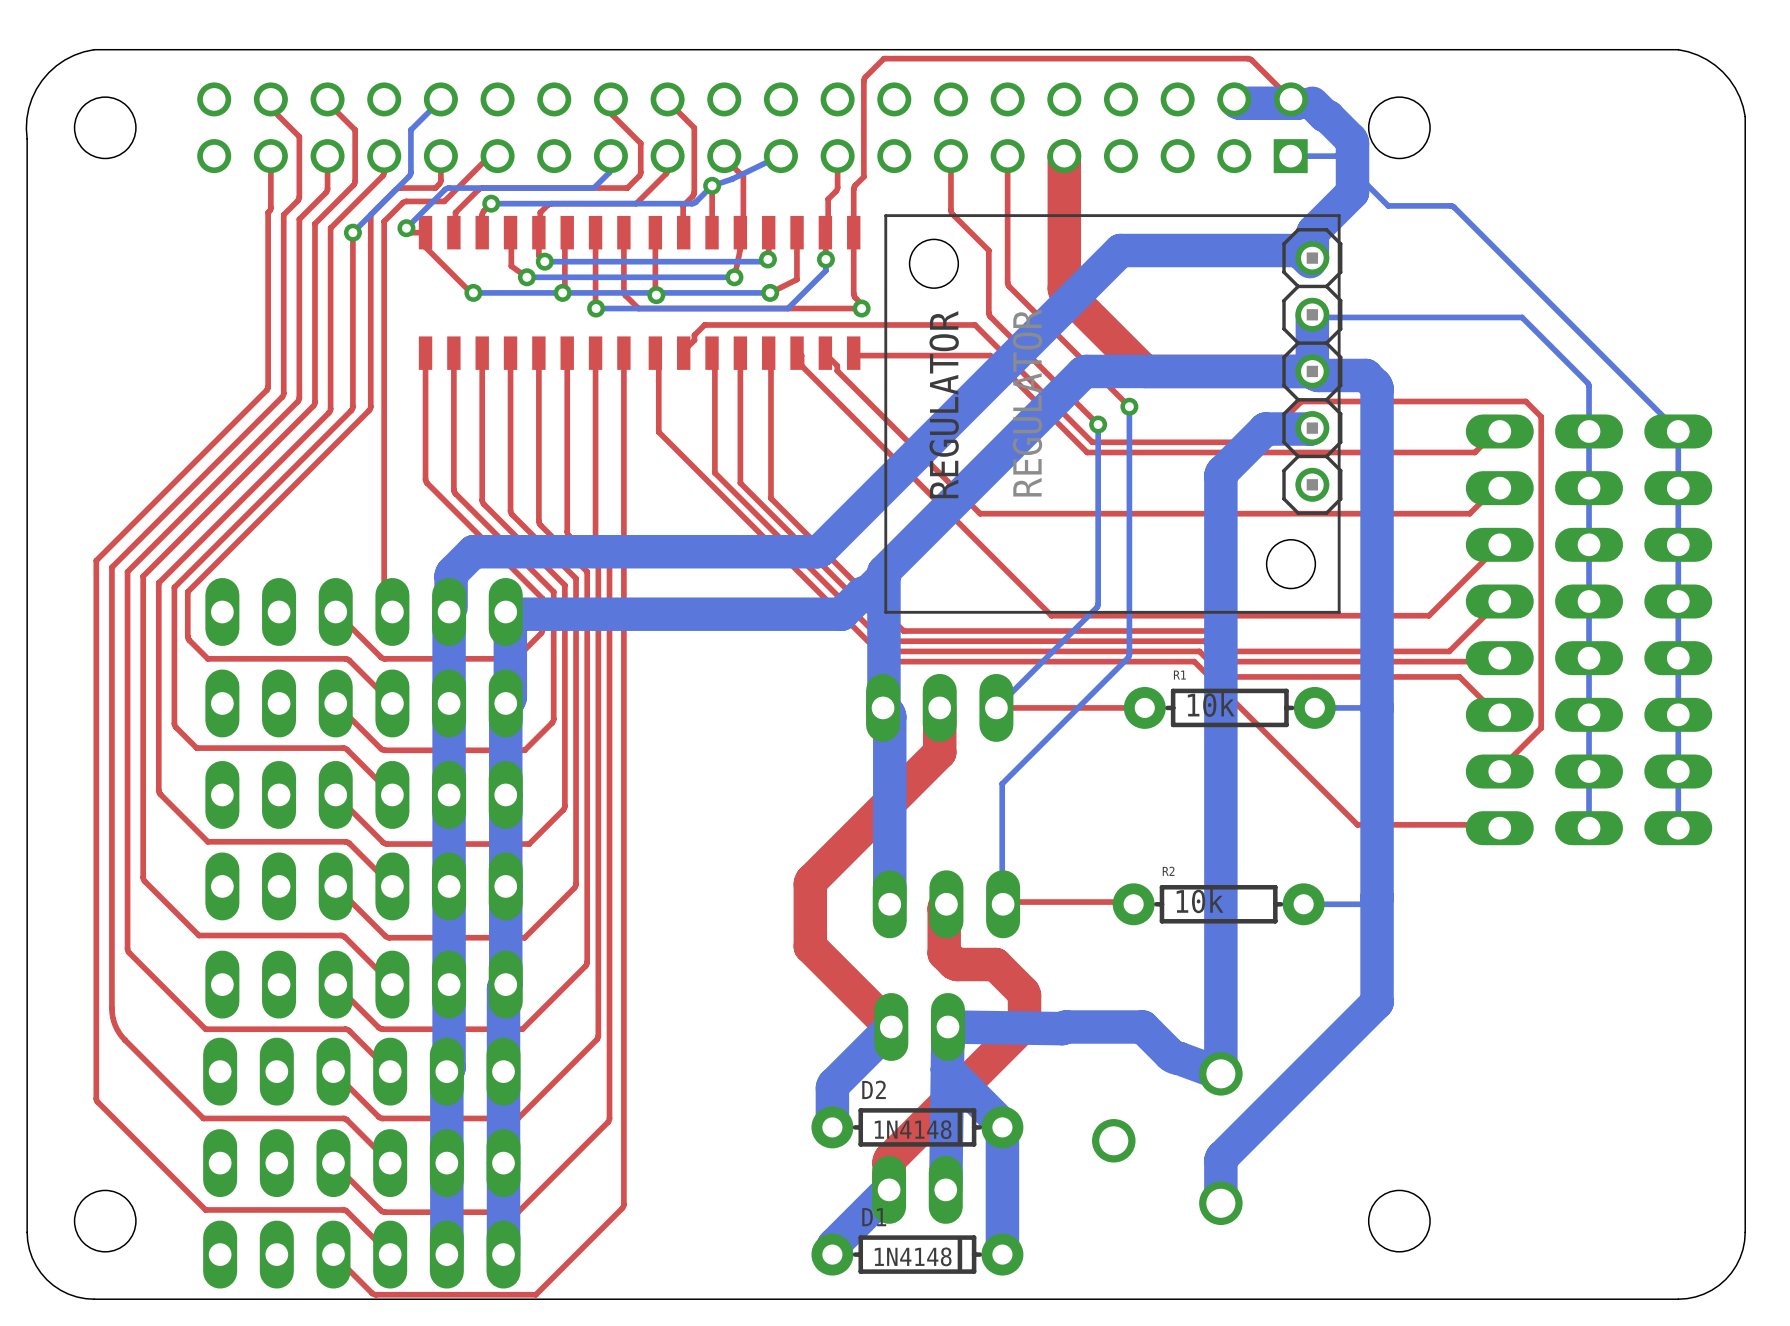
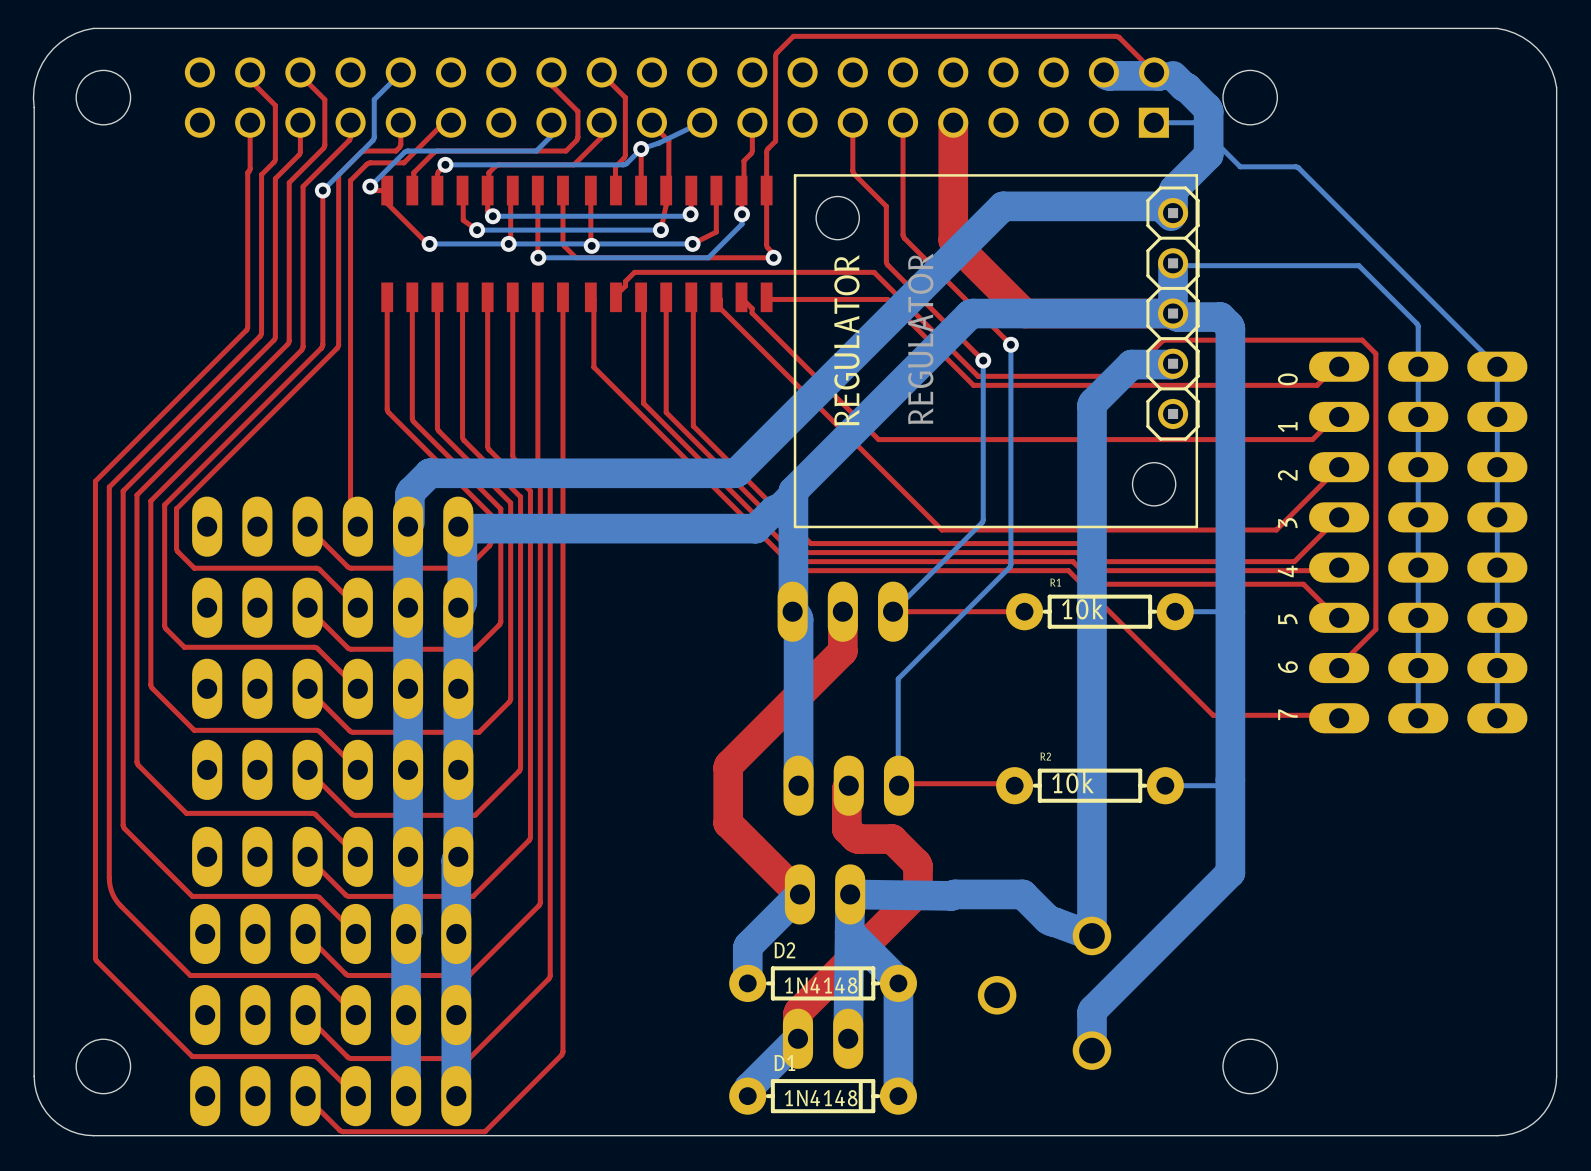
text: none -> 7 6 5 4 3 2 1 0 (1287, 546)

